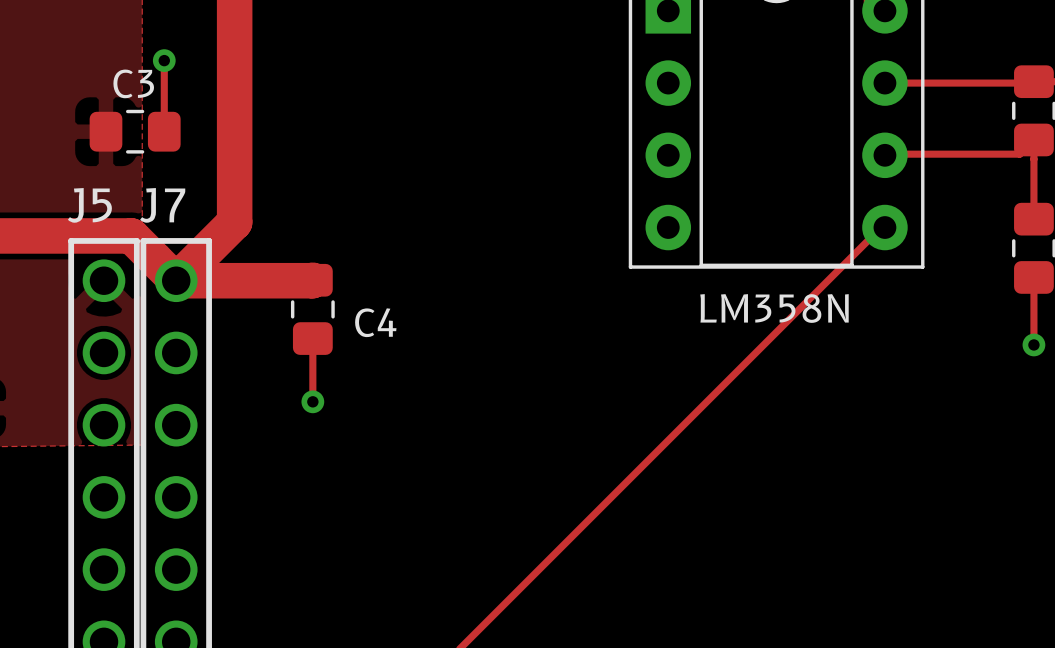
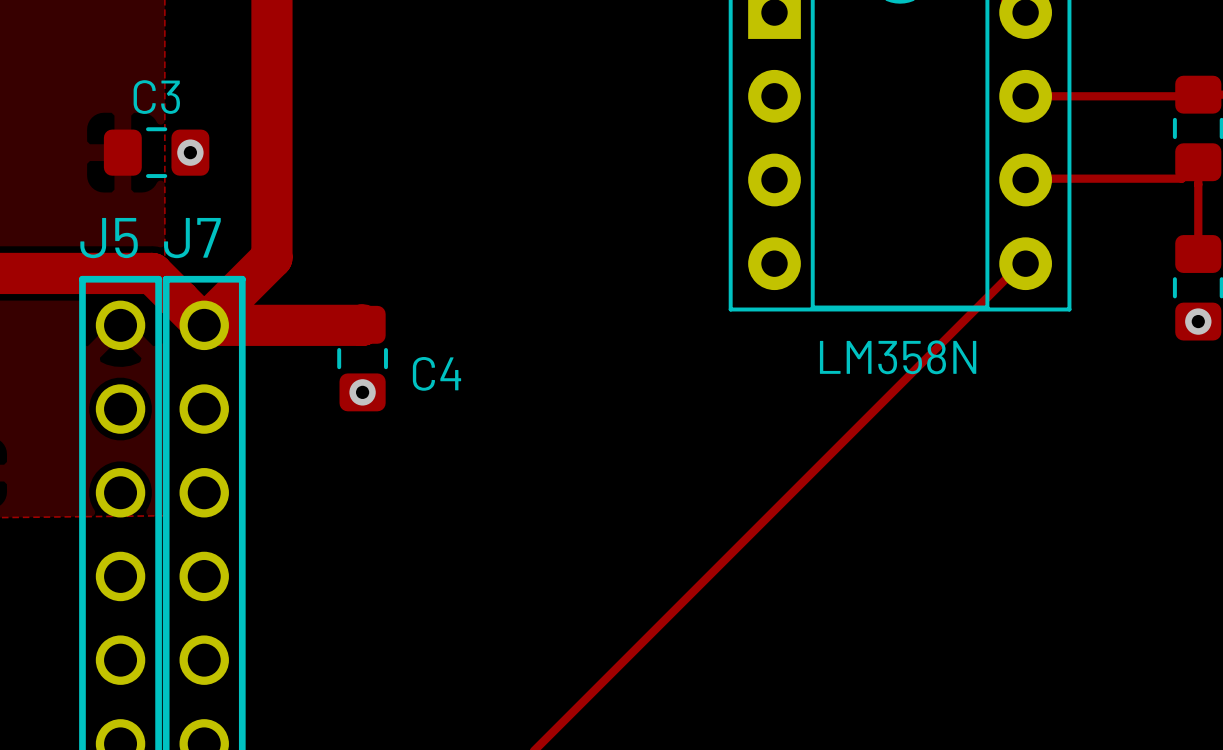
track: (164, 60) (164, 131) -> none
via position: (164, 60) -> (190, 152)
track: (1033, 277) (1033, 344) -> none
track: (312, 338) (312, 401) -> none
via position: (1033, 344) -> (1198, 321)
via position: (312, 401) -> (362, 392)

